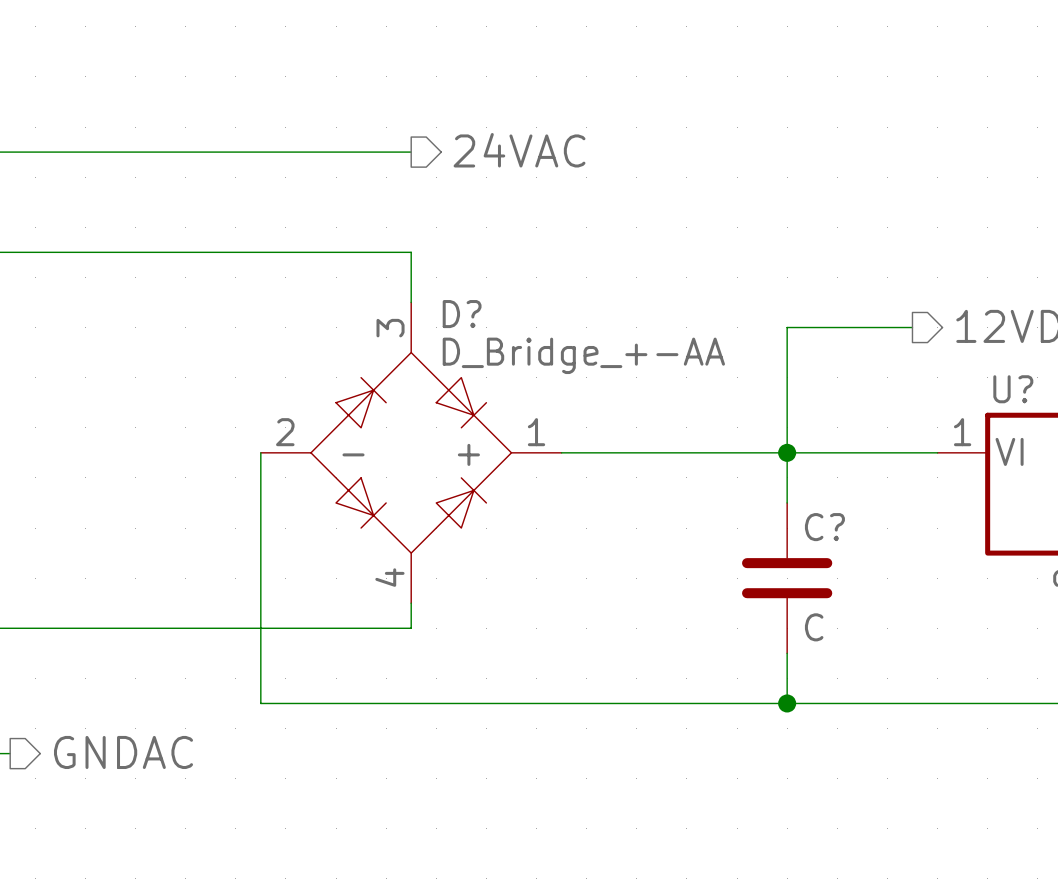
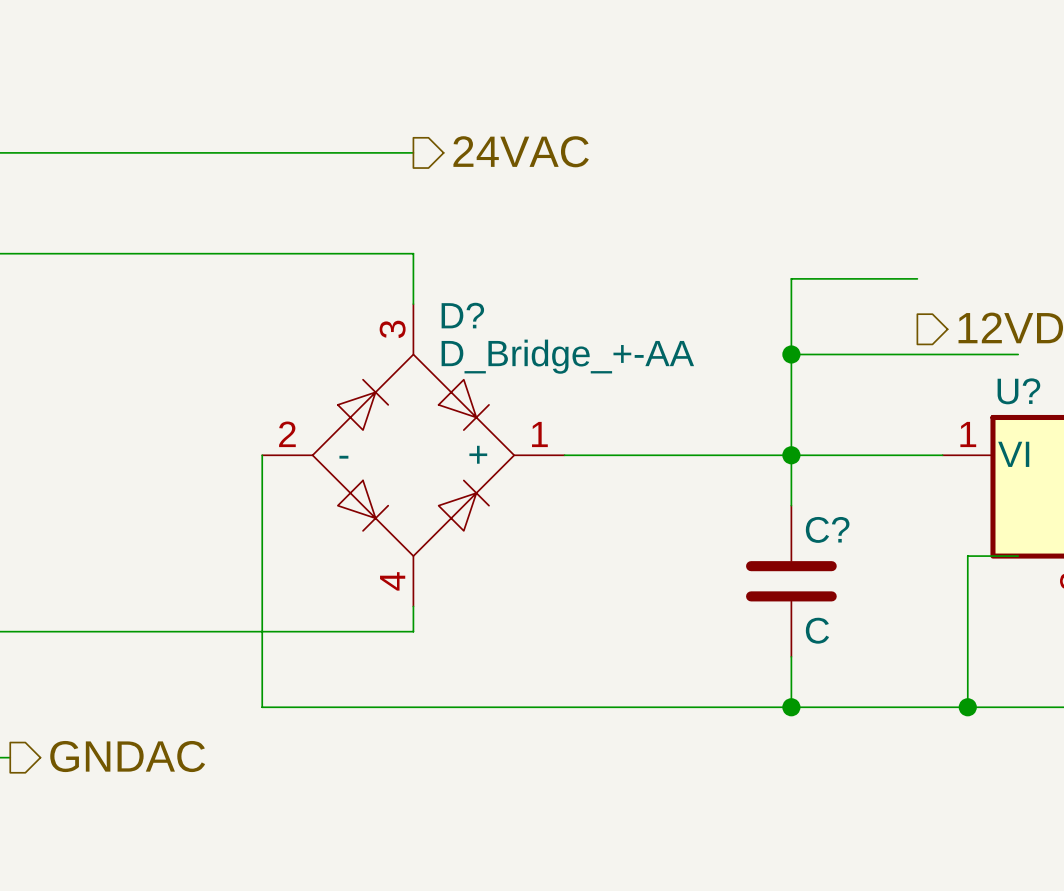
wire: (787, 327) (912, 327) -> (791, 329) (791, 278) (917, 278)
wire: none -> (791, 354) (1018, 354)
junction: none -> (791, 354)
wire: none -> (1018, 556) (967, 556) (967, 707)
junction: none -> (967, 707)

